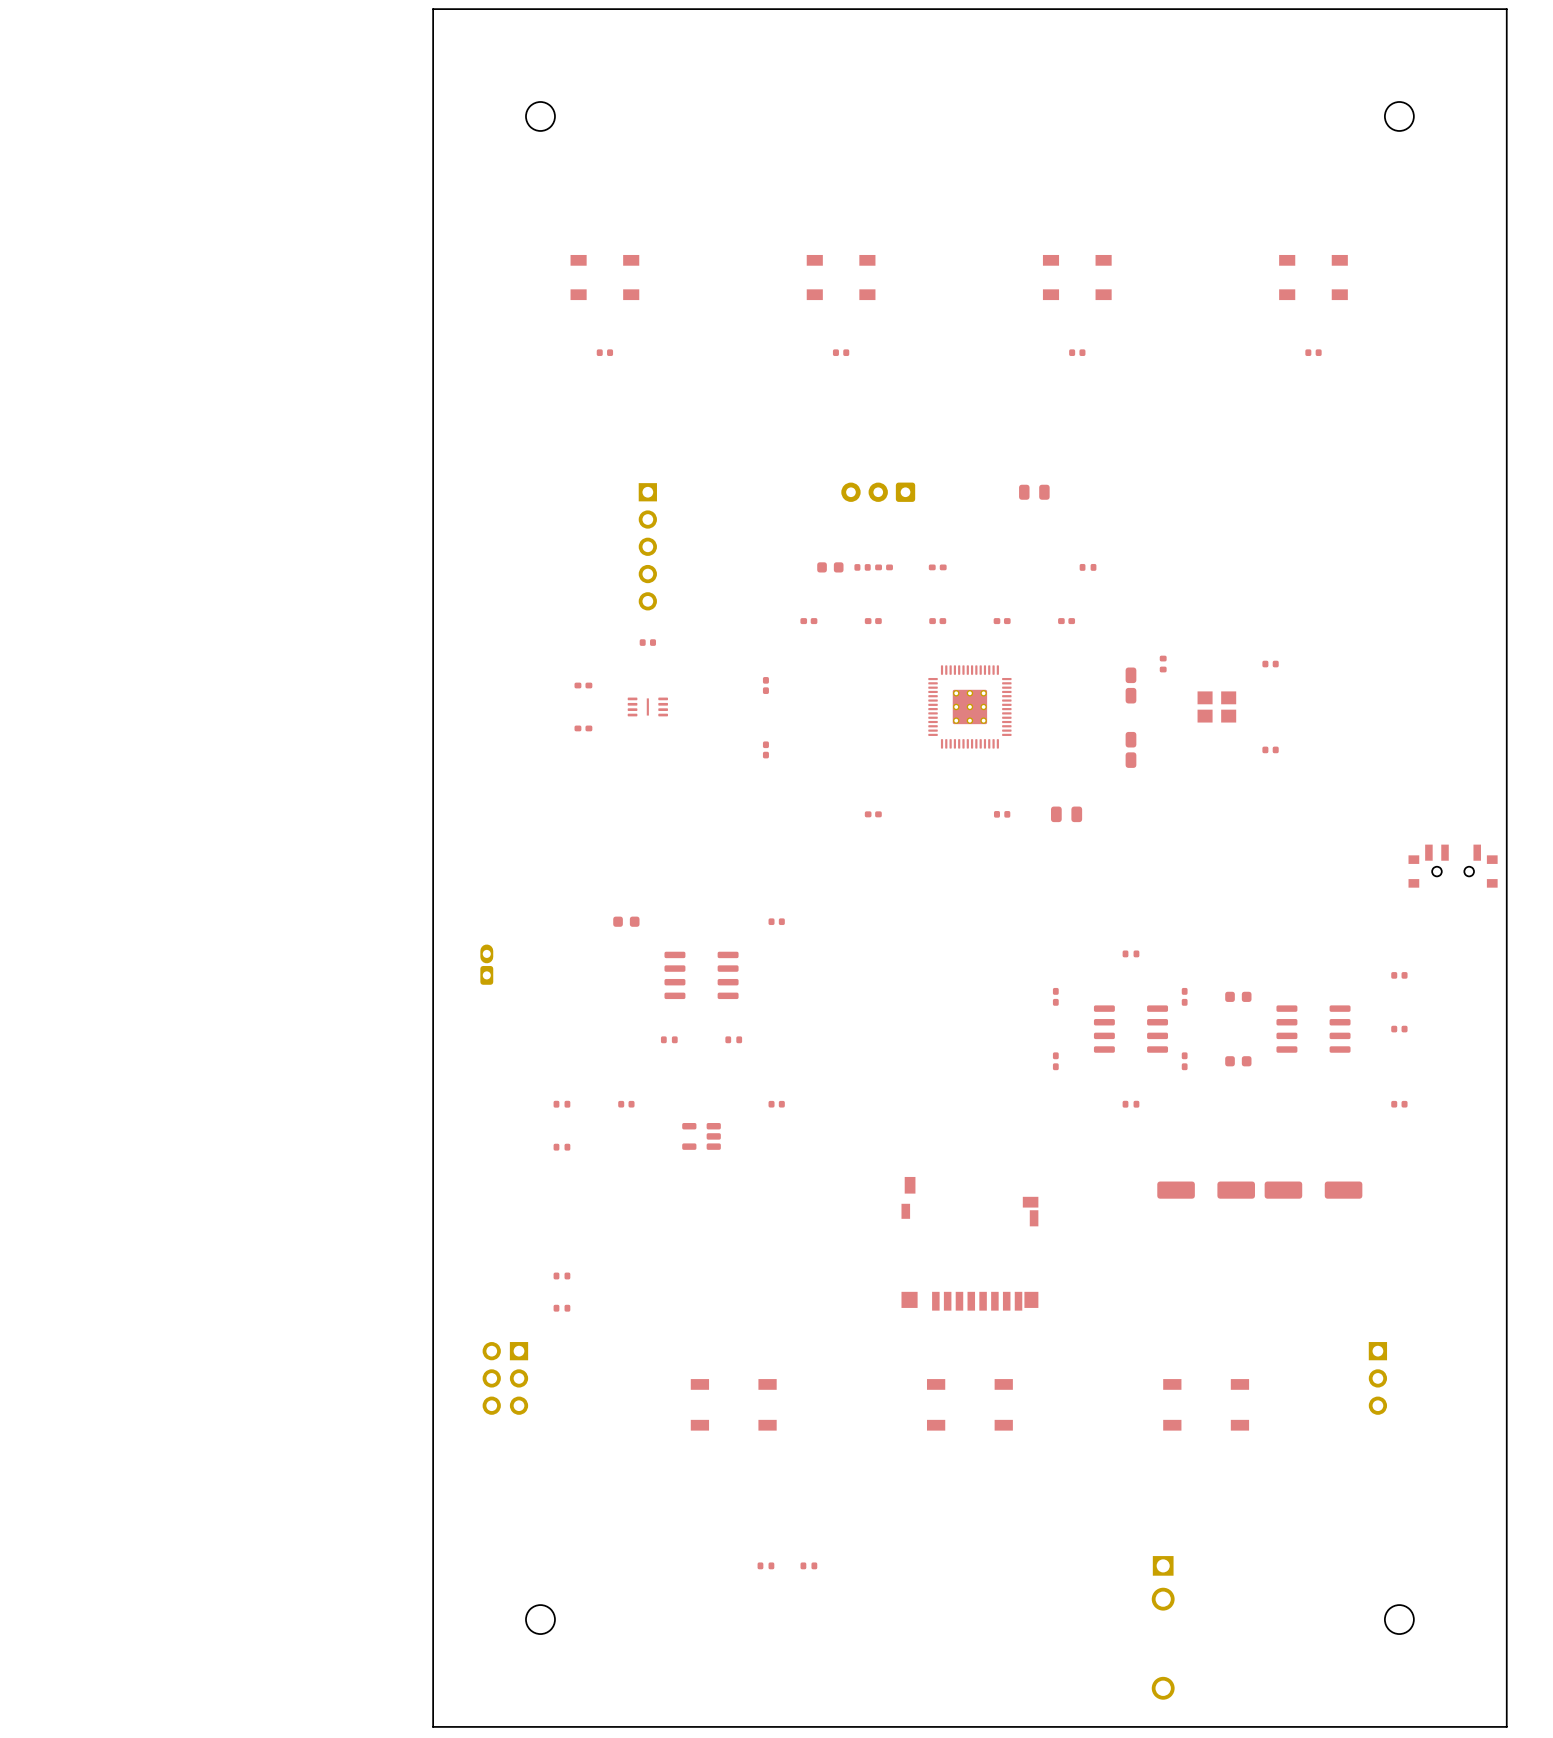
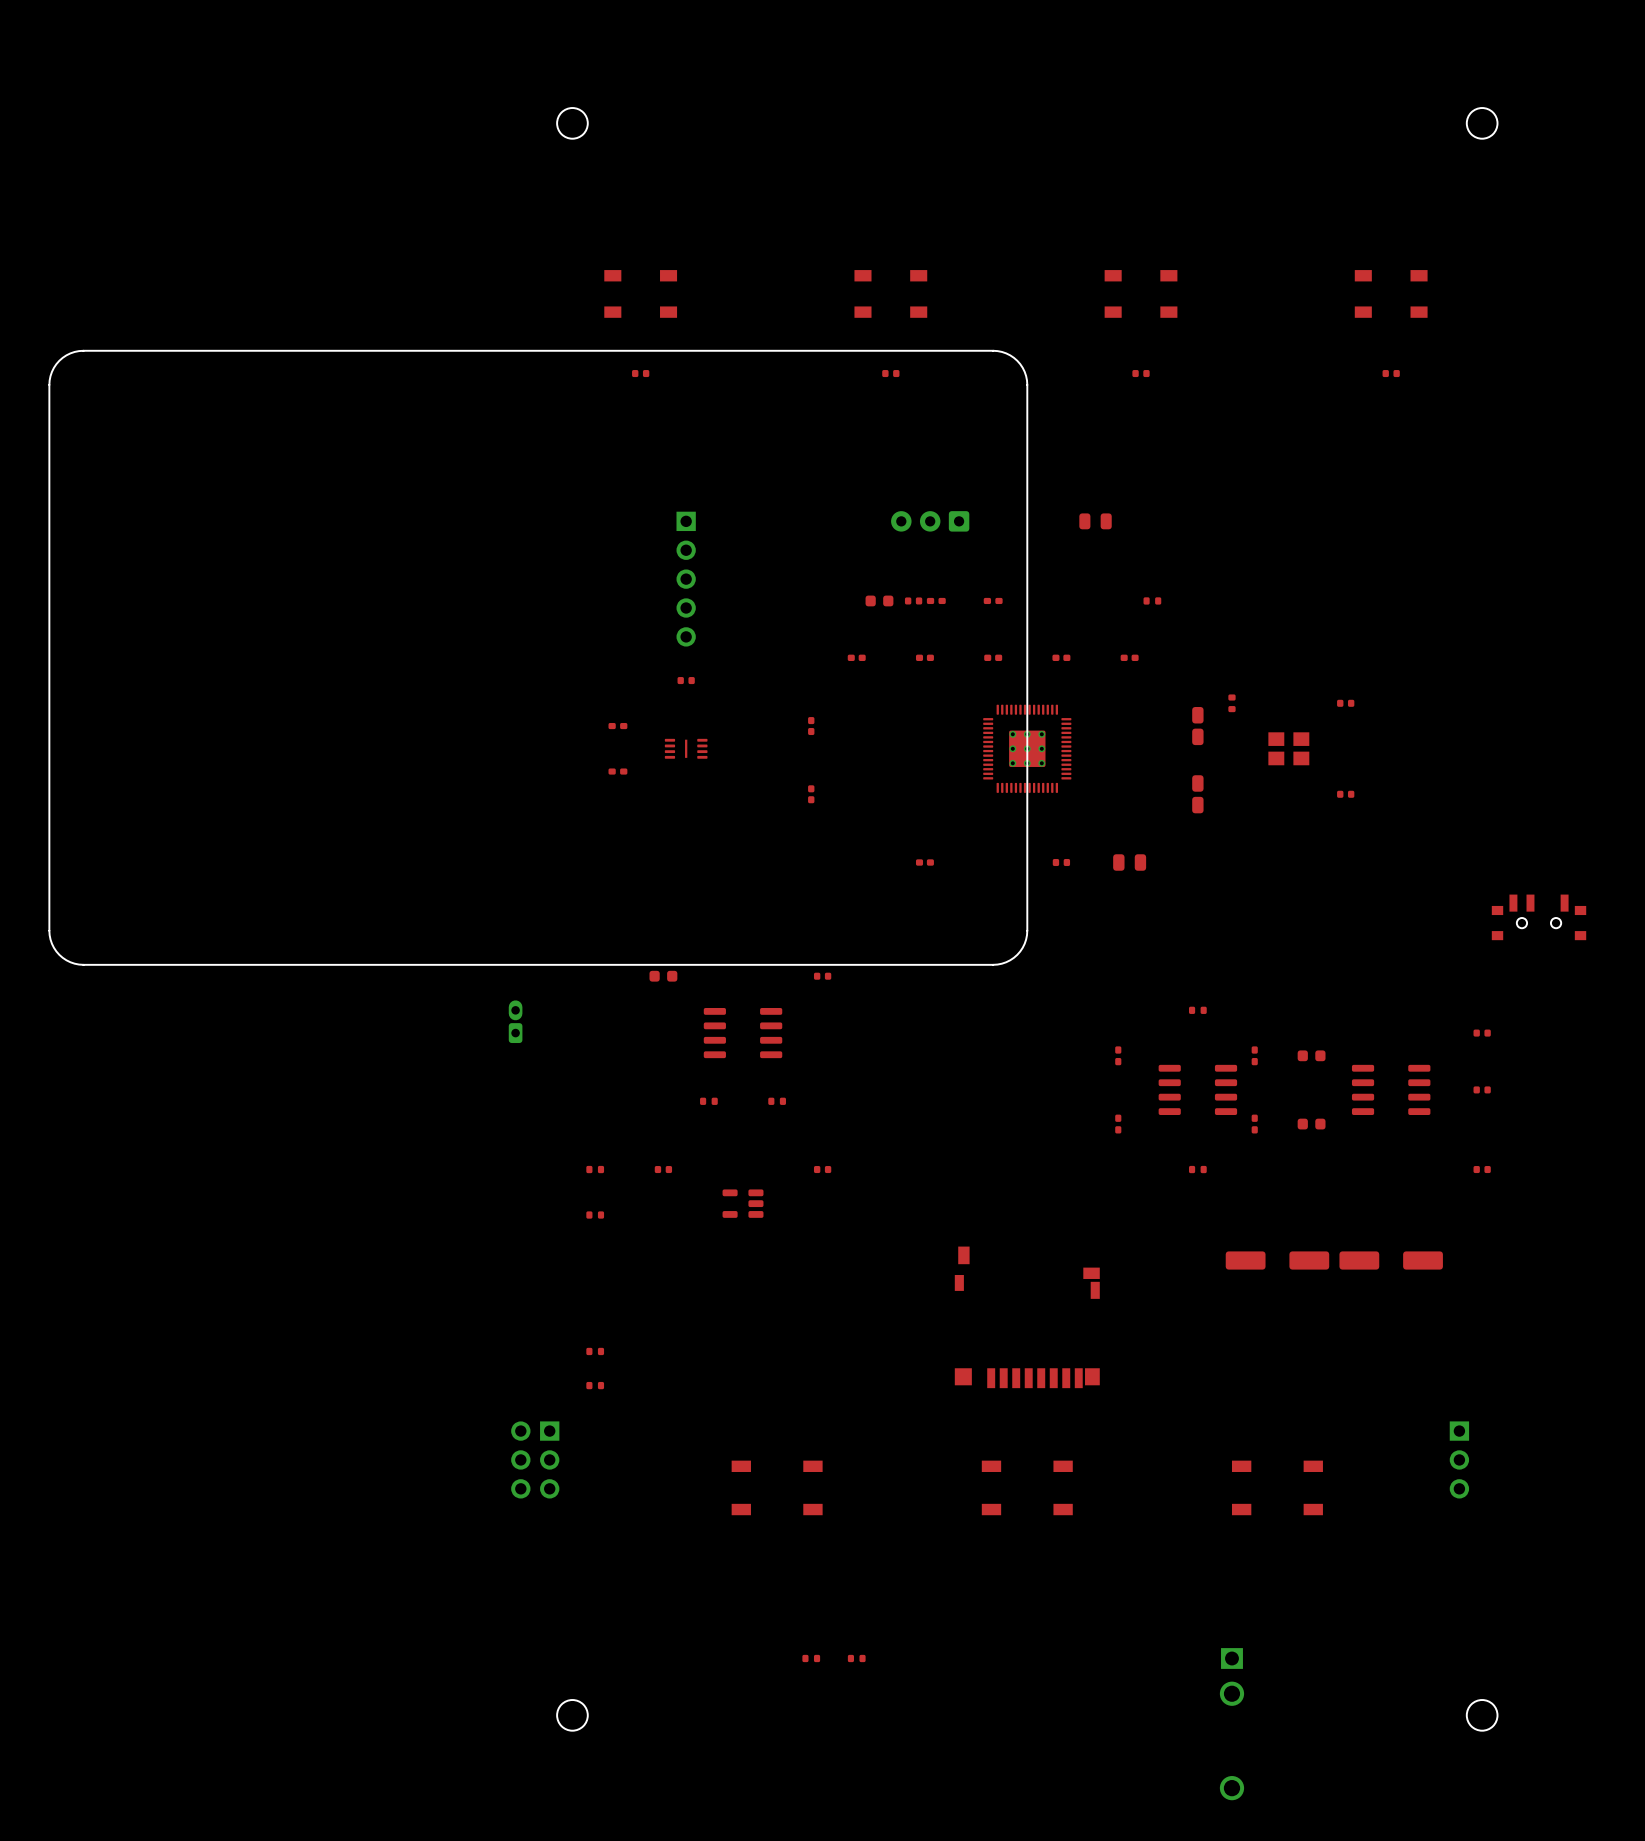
board edge: (1506, 9) (433, 9) (433, 1726) (1506, 1726) (1506, 9) -> none
board edge: none -> (993, 350) (83, 350) (66, 355) (53, 367) (49, 384) (49, 930) (53, 947) (66, 960) (83, 964) (993, 964) (1010, 960) (1022, 947) (1027, 930) (1027, 384) (1024, 371) (1017, 360) (1006, 353) (993, 350)

